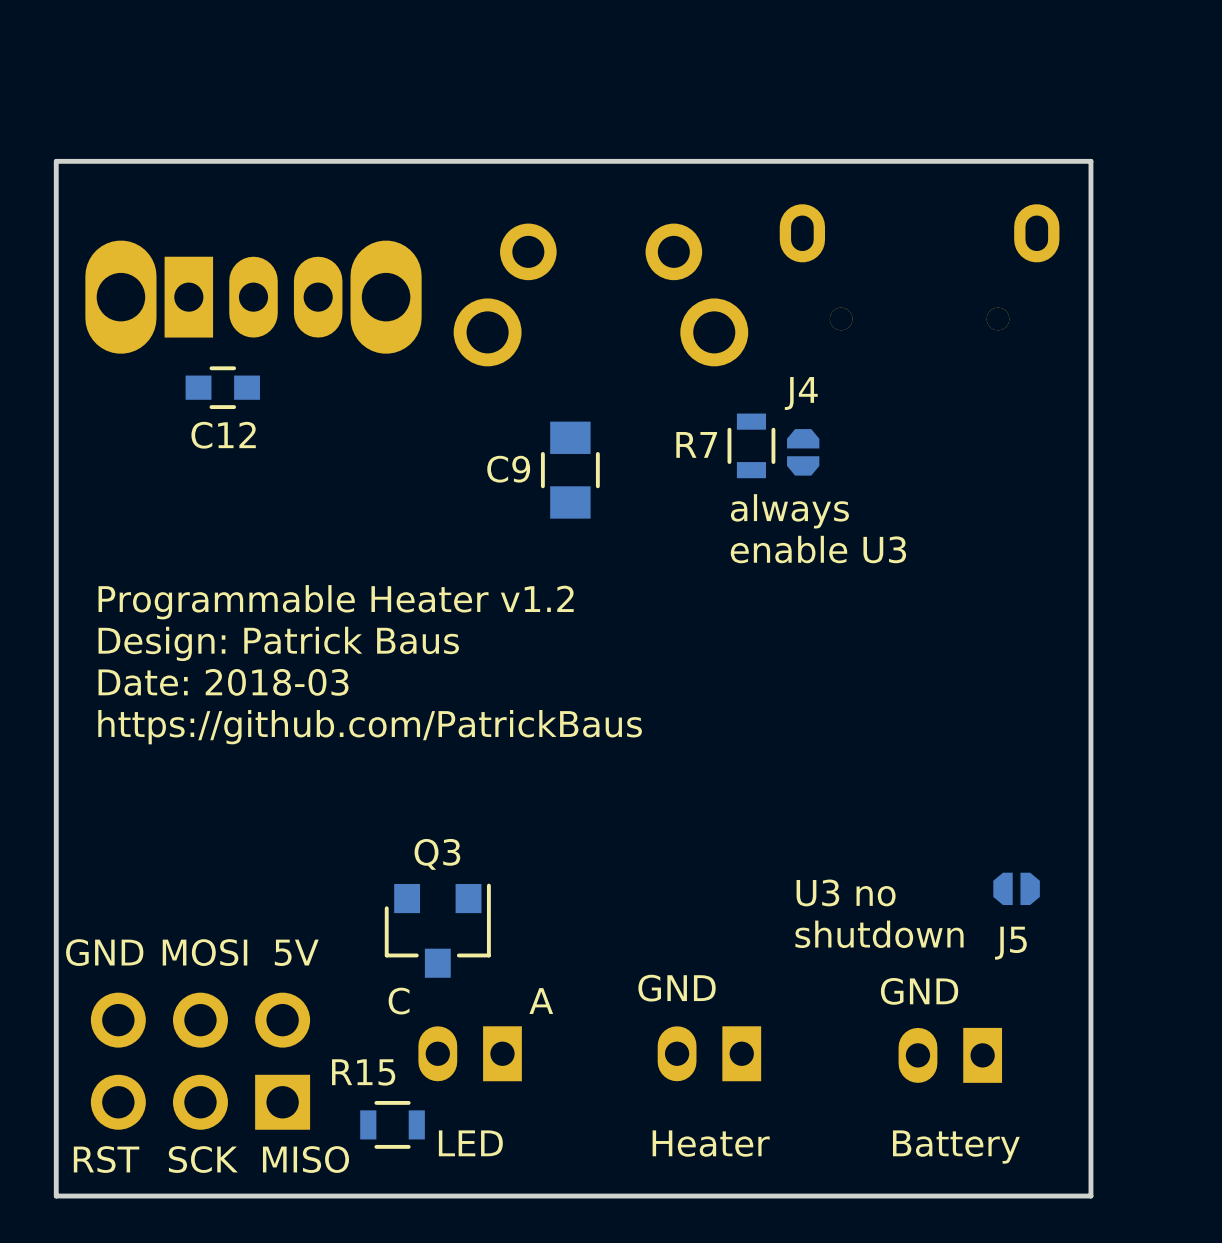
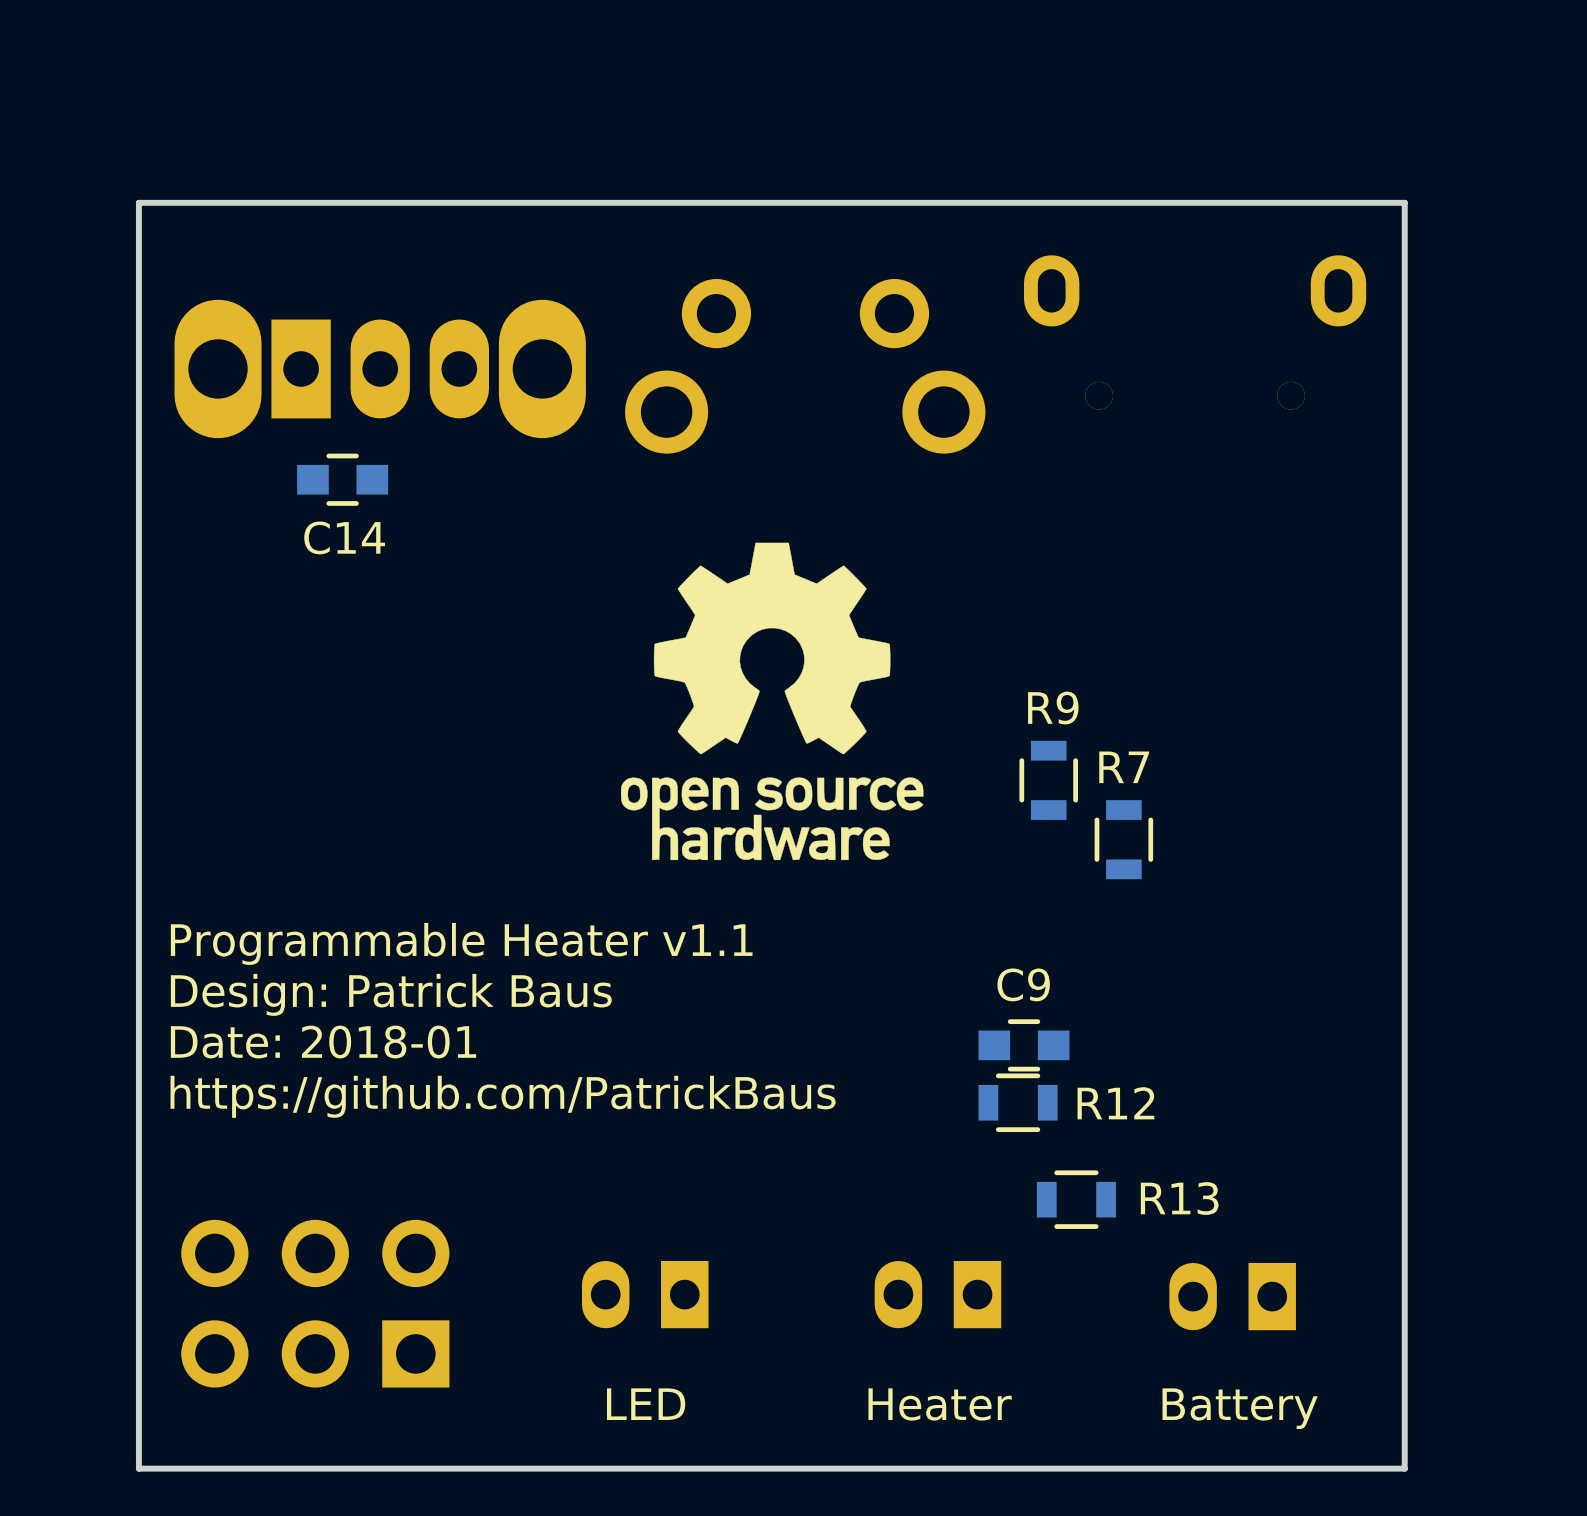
C9 footprint: [540, 421, 600, 519] -> [978, 1019, 1070, 1072]
C12 name: C12 (223, 435) -> C14 (344, 537)
drawing: none -> [620, 542, 924, 861]
R7 name position: R7 (696, 444) -> R7 (1124, 767)
R7 position: (751, 445) -> (1123, 839)
J4: (803, 452) -> none
C9 name position: C9 (508, 469) -> C9 (1023, 984)
text: always (789, 511) -> none
text: enable U3 (818, 549) -> none
text: Programmable Heater v1.2 (336, 602) -> none
R9: none -> (1048, 780)
text position: Design: Patrick Baus (278, 643) -> Design: Patrick Baus (391, 994)
text: Date: 2018-03 (223, 682) -> none
text position: https://github.com/PatrickBaus (370, 727) -> https://github.com/PatrickBaus (503, 1096)
text: none -> Programmable Heater v1.1 (461, 943)
text: none -> Date: 2018-01 (323, 1042)
J5: (1016, 888) -> none
text: U3 no (846, 892) -> none
R12: none -> (1018, 1102)
Q3: (437, 930) -> none
text: shutdown (879, 934) -> none
text: GND (104, 952) -> none
text: MOSI (205, 952) -> none
text: 5V (296, 952) -> none
R13: none -> (1076, 1199)
text: GND (677, 988) -> none
text: GND (919, 991) -> none
text: C (399, 1001) -> none
text: A (541, 1001) -> none
R15: (392, 1124) -> none
text: RST (106, 1159) -> none
text: SCK (203, 1159) -> none
text: MISO (305, 1159) -> none

